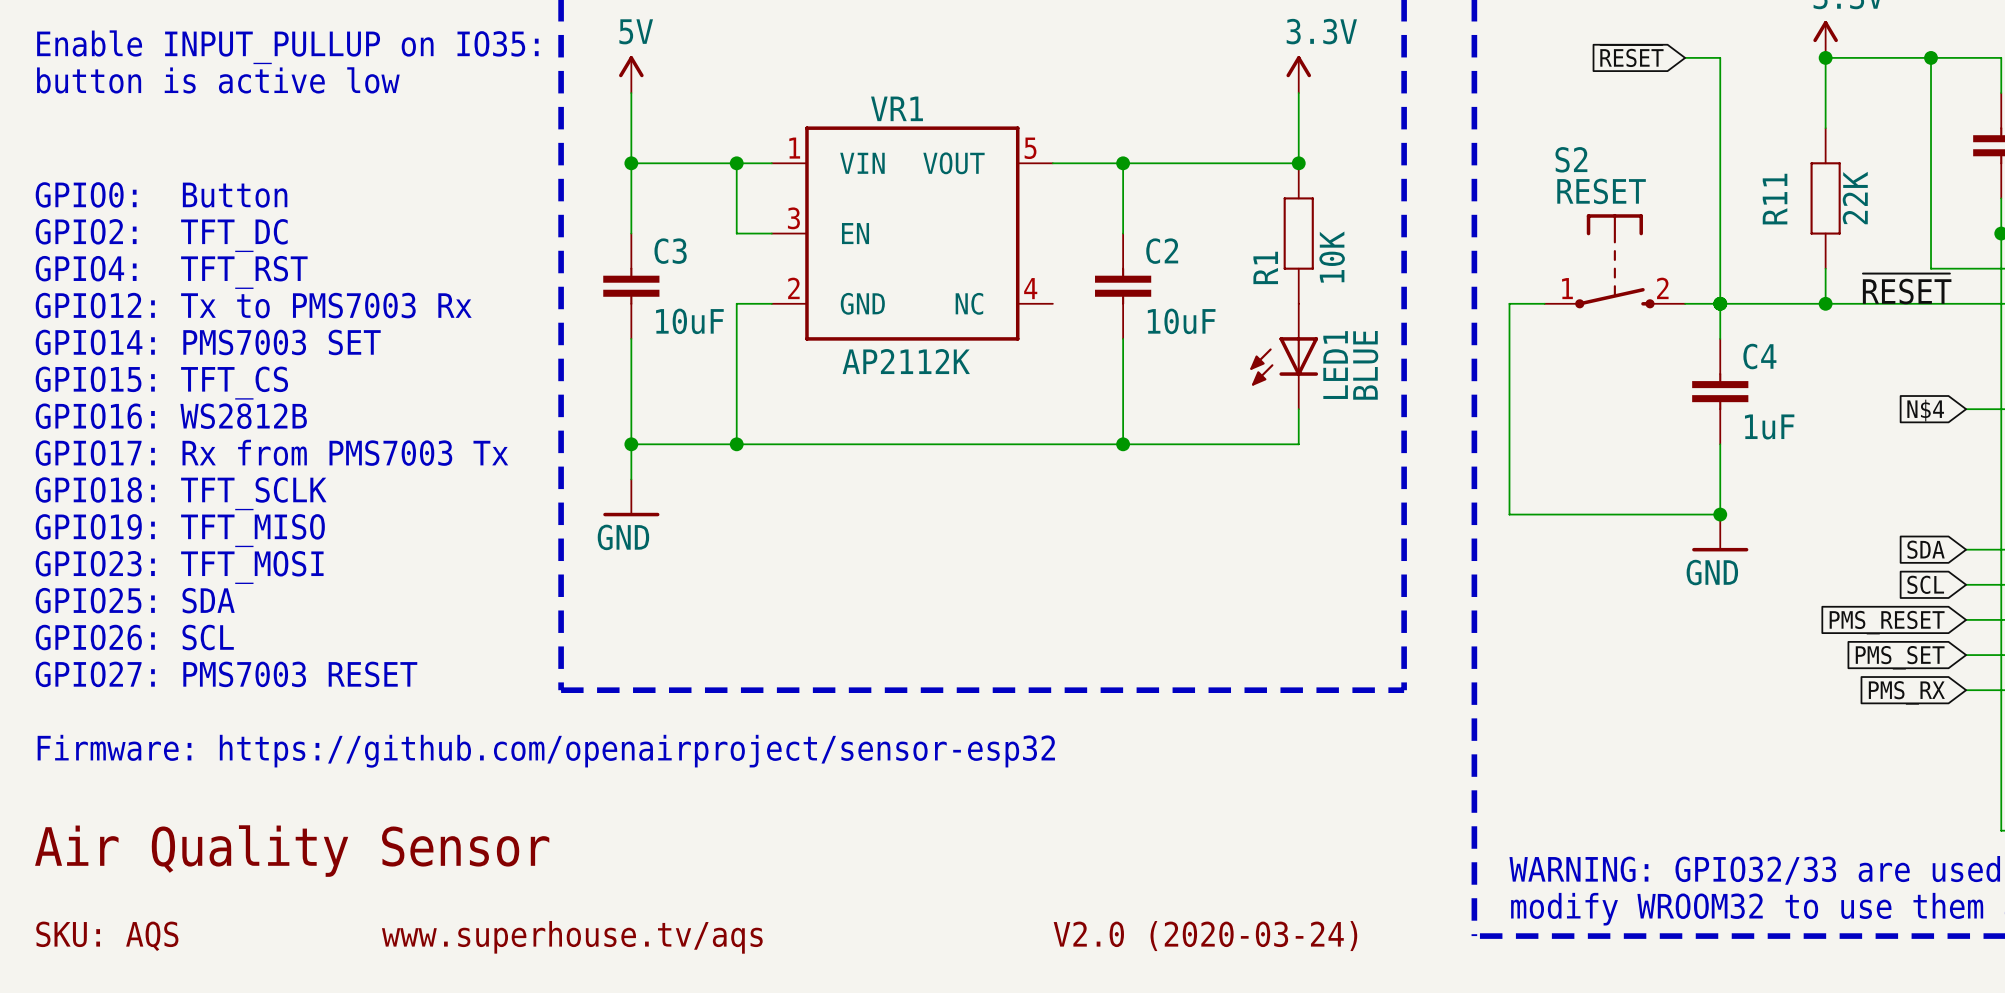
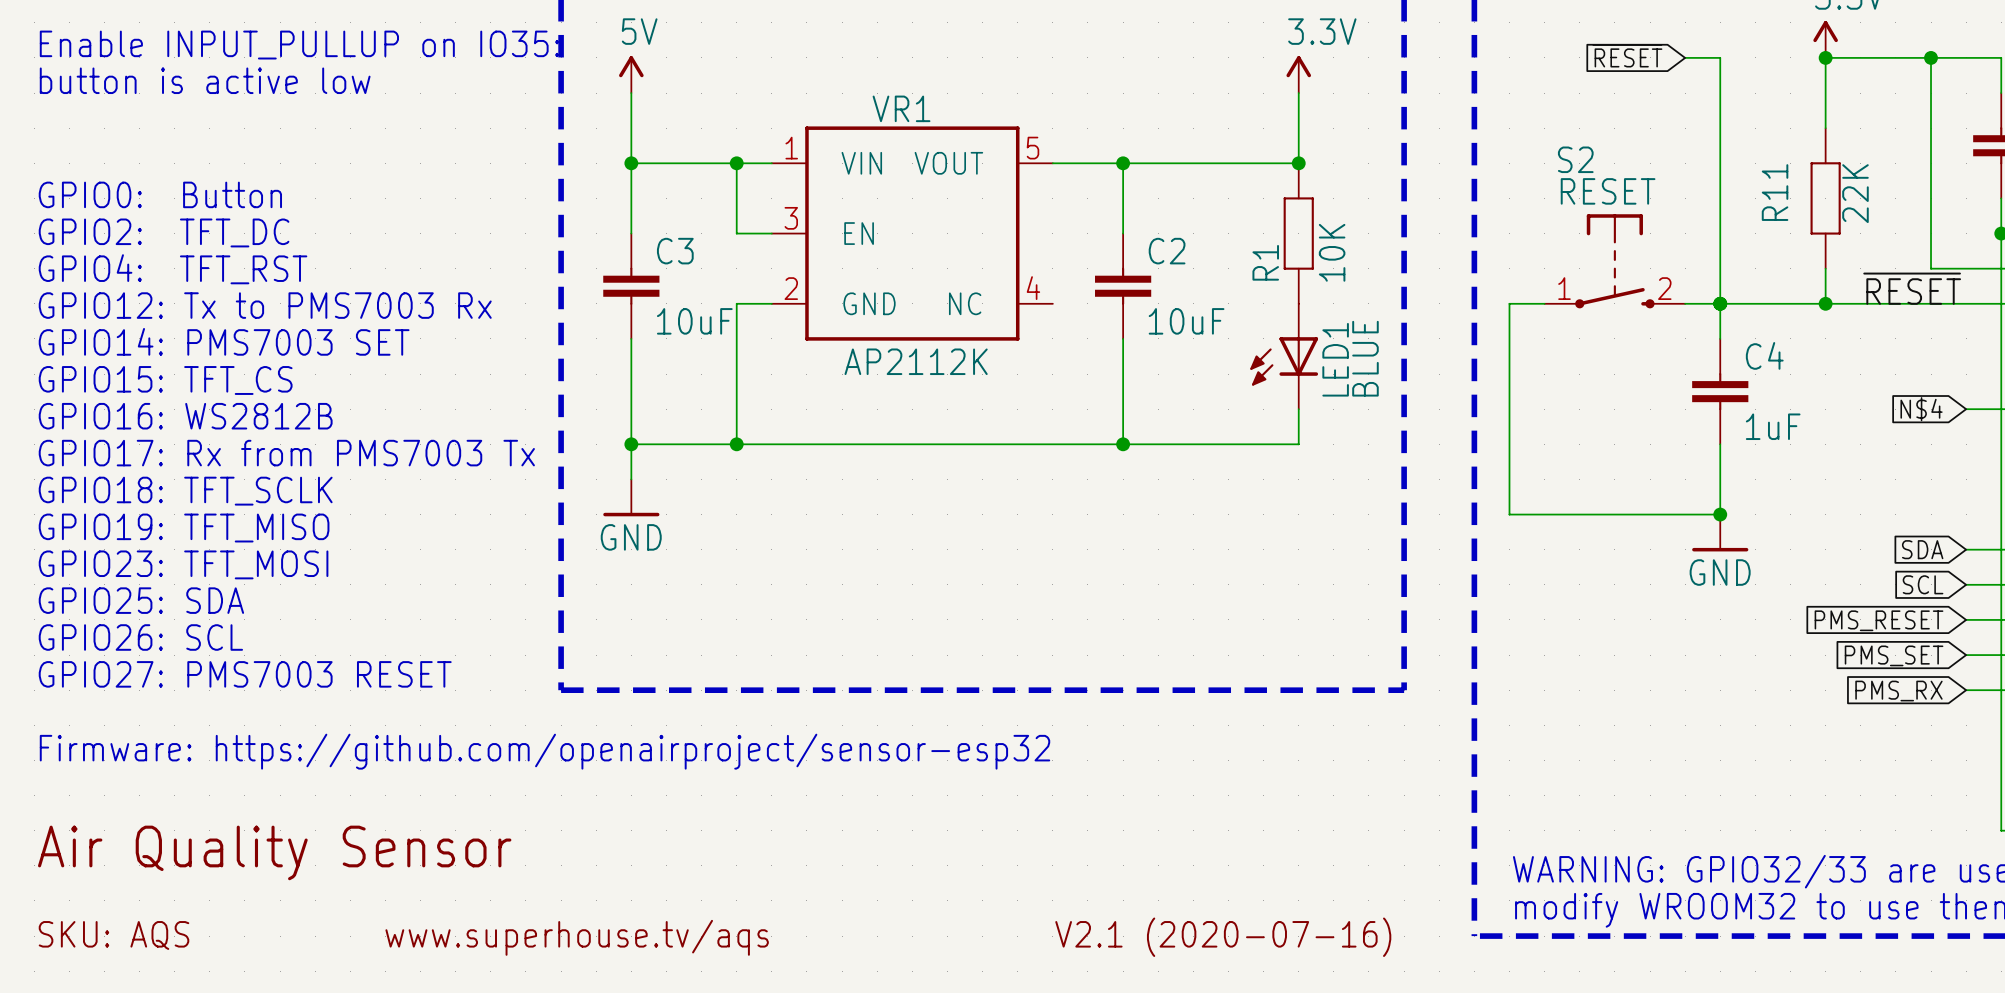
text: V2.0 (2020-03-24) (1205, 936) -> V2.1 (2020-07-16) (1223, 937)

